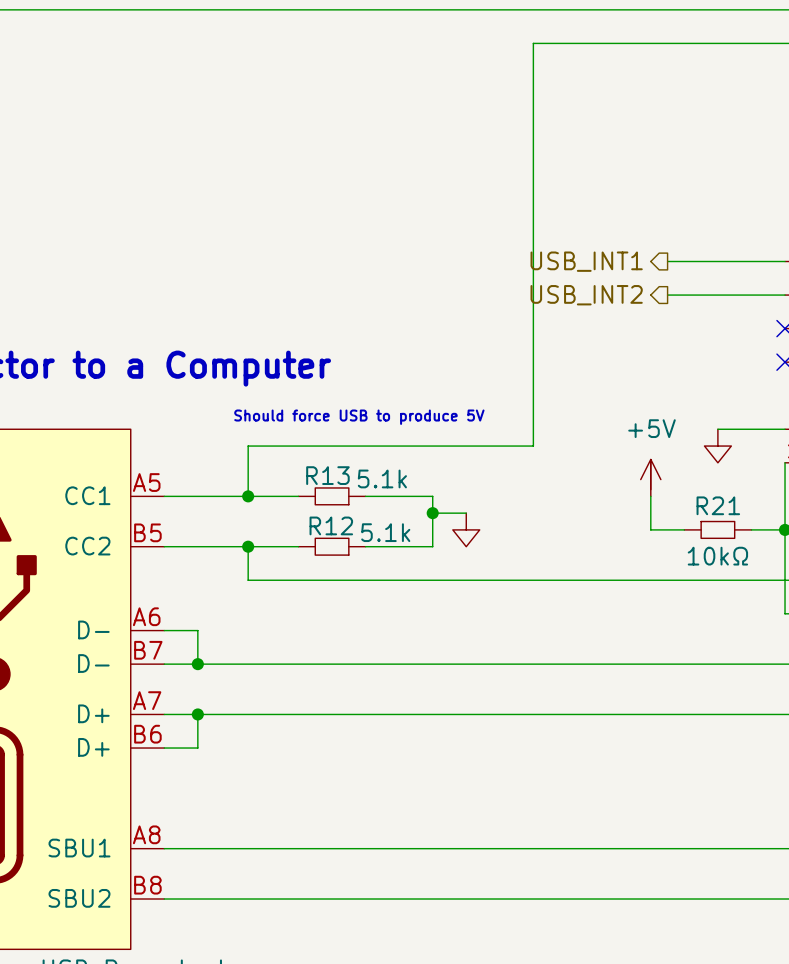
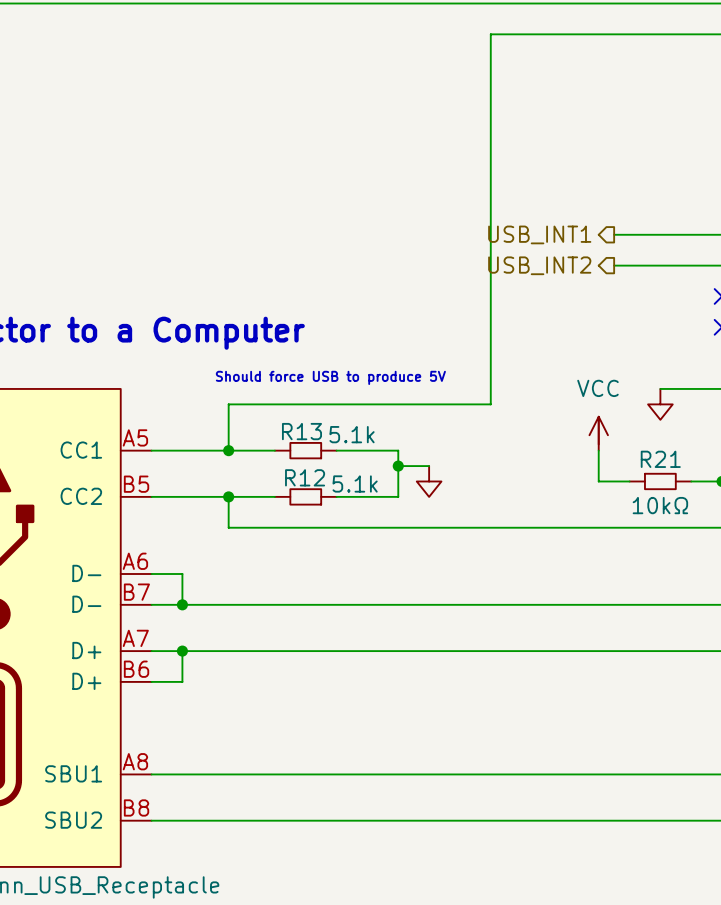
power symbol: +5V (650, 477) -> VCC (598, 433)

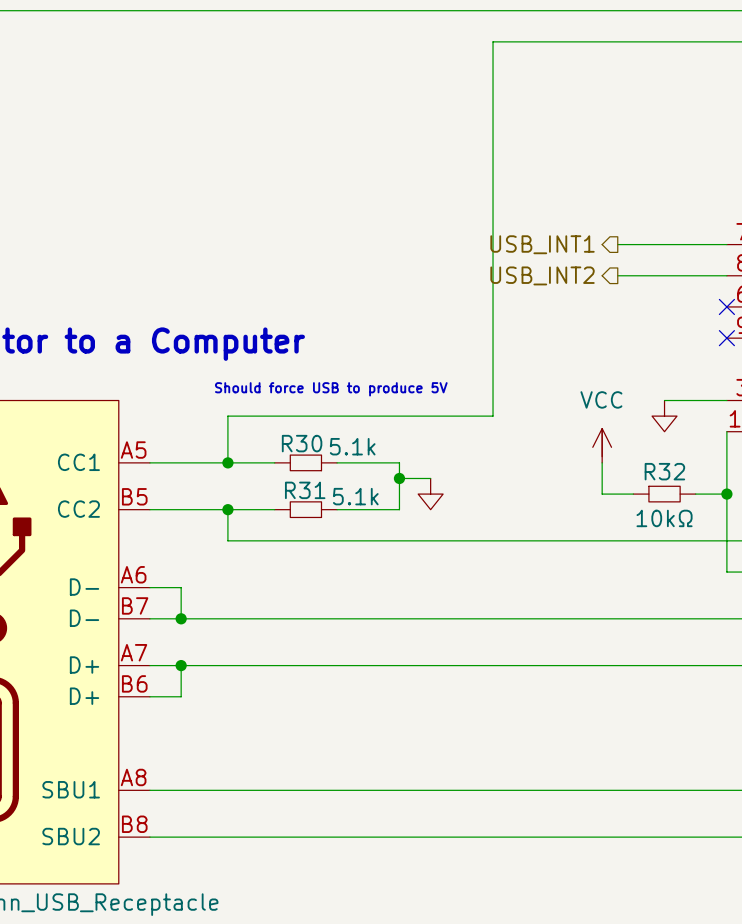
R13 name: R13 (301, 431) -> R30 (302, 443)
R21 name: R21 (660, 459) -> R32 (664, 471)
R12 name: R12 (305, 477) -> R31 (305, 490)

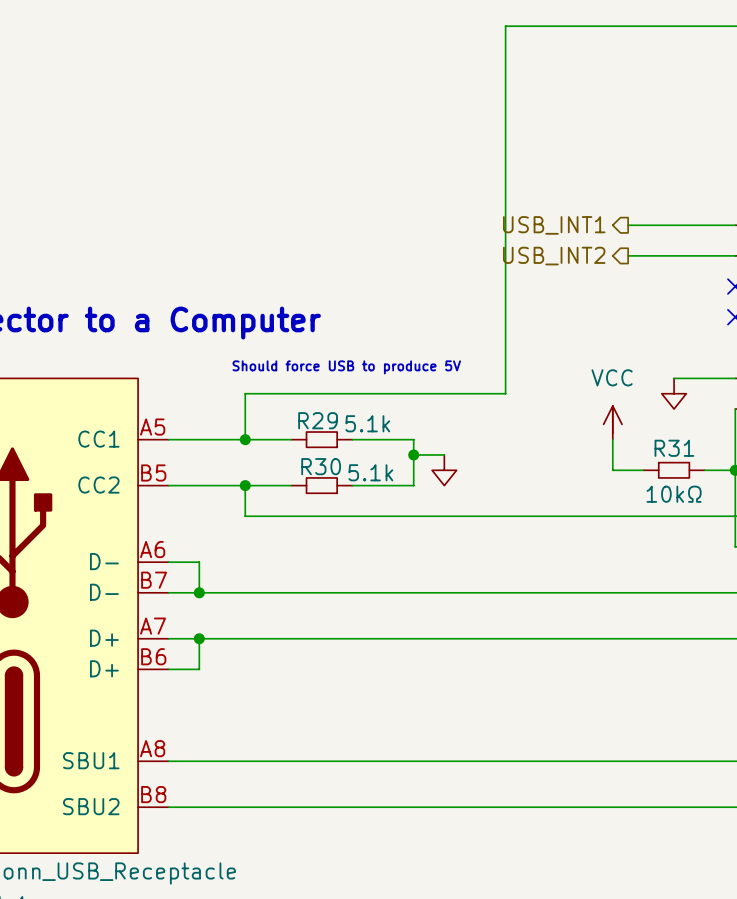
R30 name: R30 (302, 443) -> R29 (318, 420)
R32 name: R32 (664, 471) -> R31 (674, 448)
R31 name: R31 (305, 490) -> R30 (321, 466)

